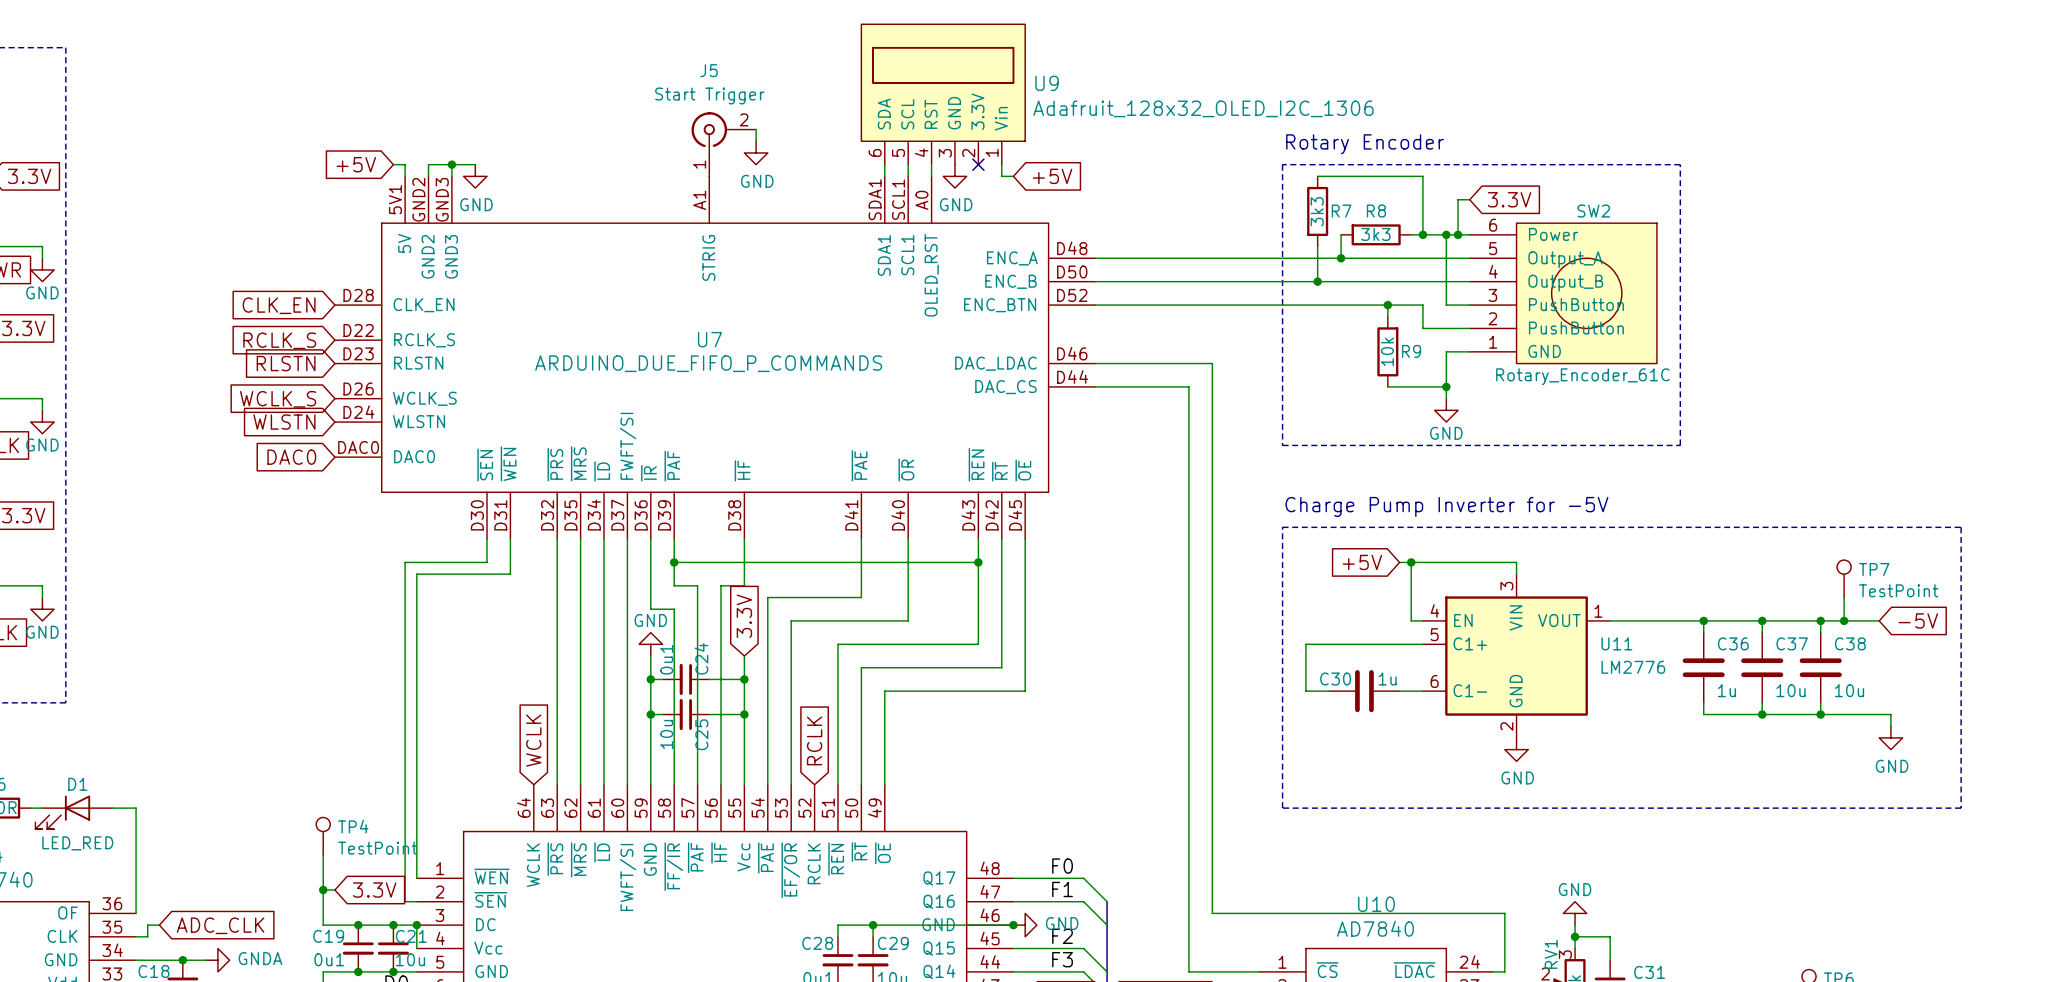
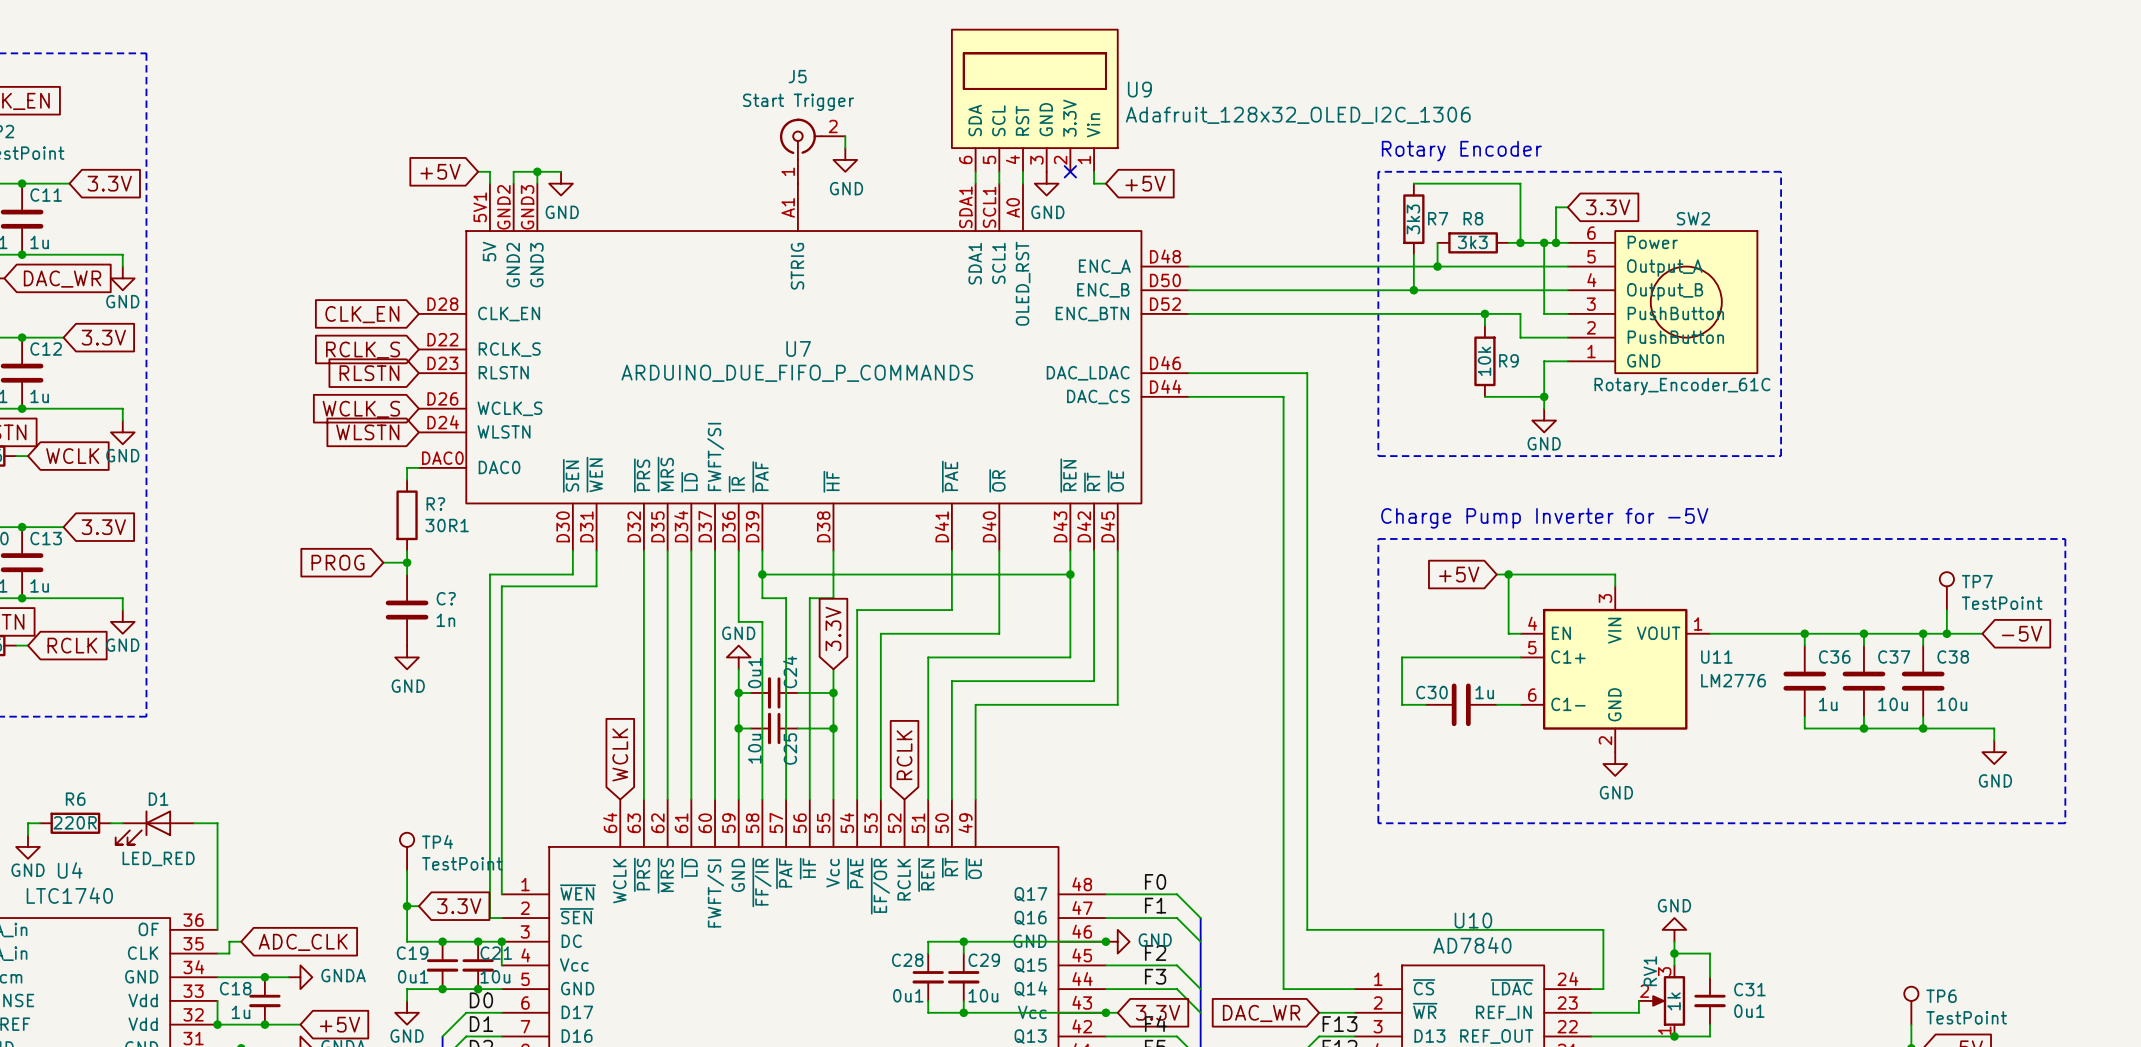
global label: DAC0 (291, 457) -> none
wire: none -> (418, 467) (407, 467) (407, 479)
R?: none -> 30R1 (407, 515)
wire: none -> (407, 550) (407, 574)
global label: none -> PROG (338, 562)
wire: none -> (383, 562) (407, 562)
junction: none -> (407, 562)
C?: none -> 1n (407, 610)
power symbol: none -> GND (407, 657)

